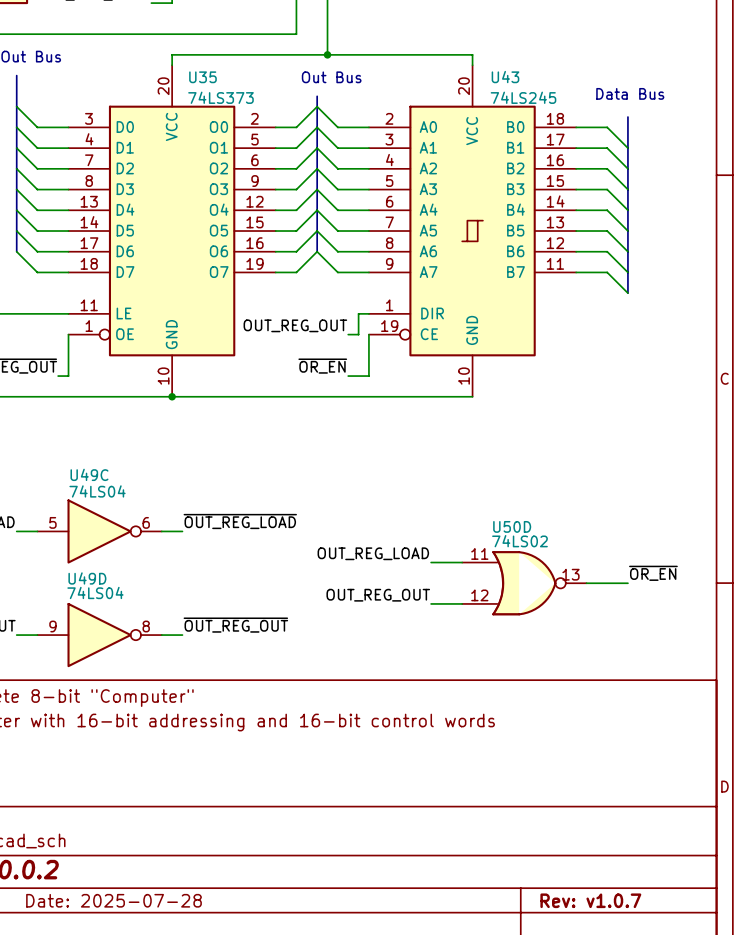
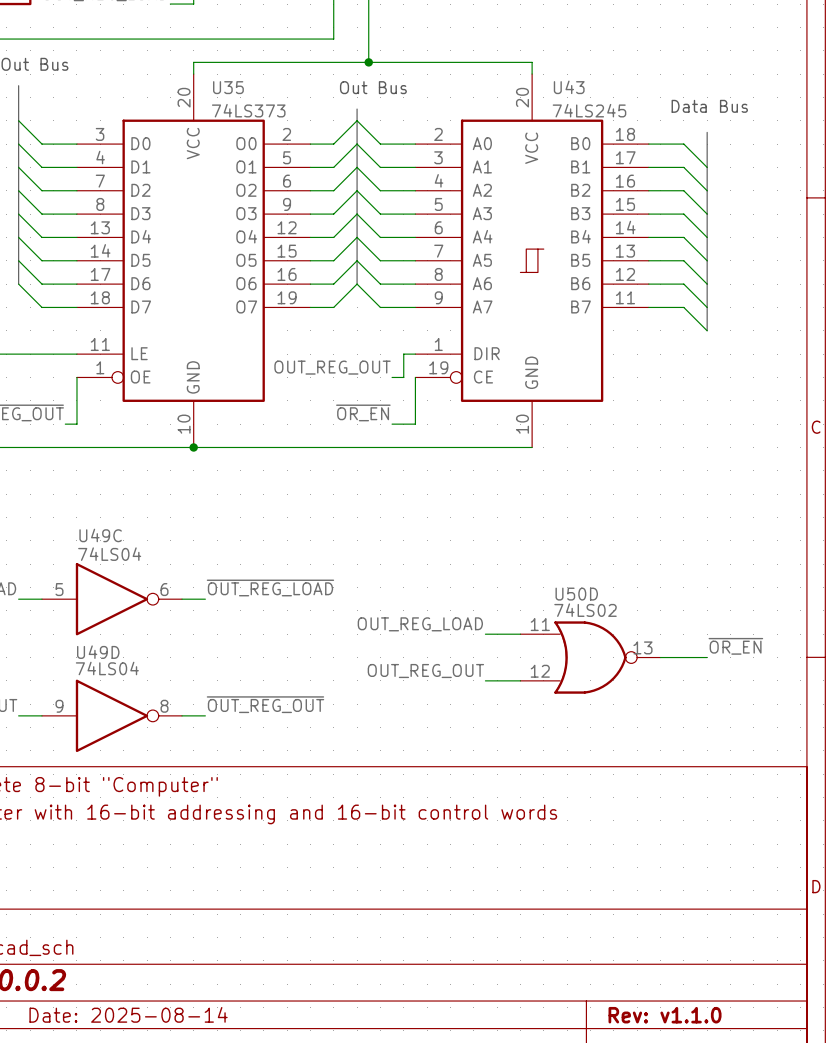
title block: Date: 2025-07-28 (114, 900) -> Date: 2025-08-14 (128, 1014)
title block: Rev: v1.0.7 (590, 900) -> Rev: v1.1.0 (665, 1015)

